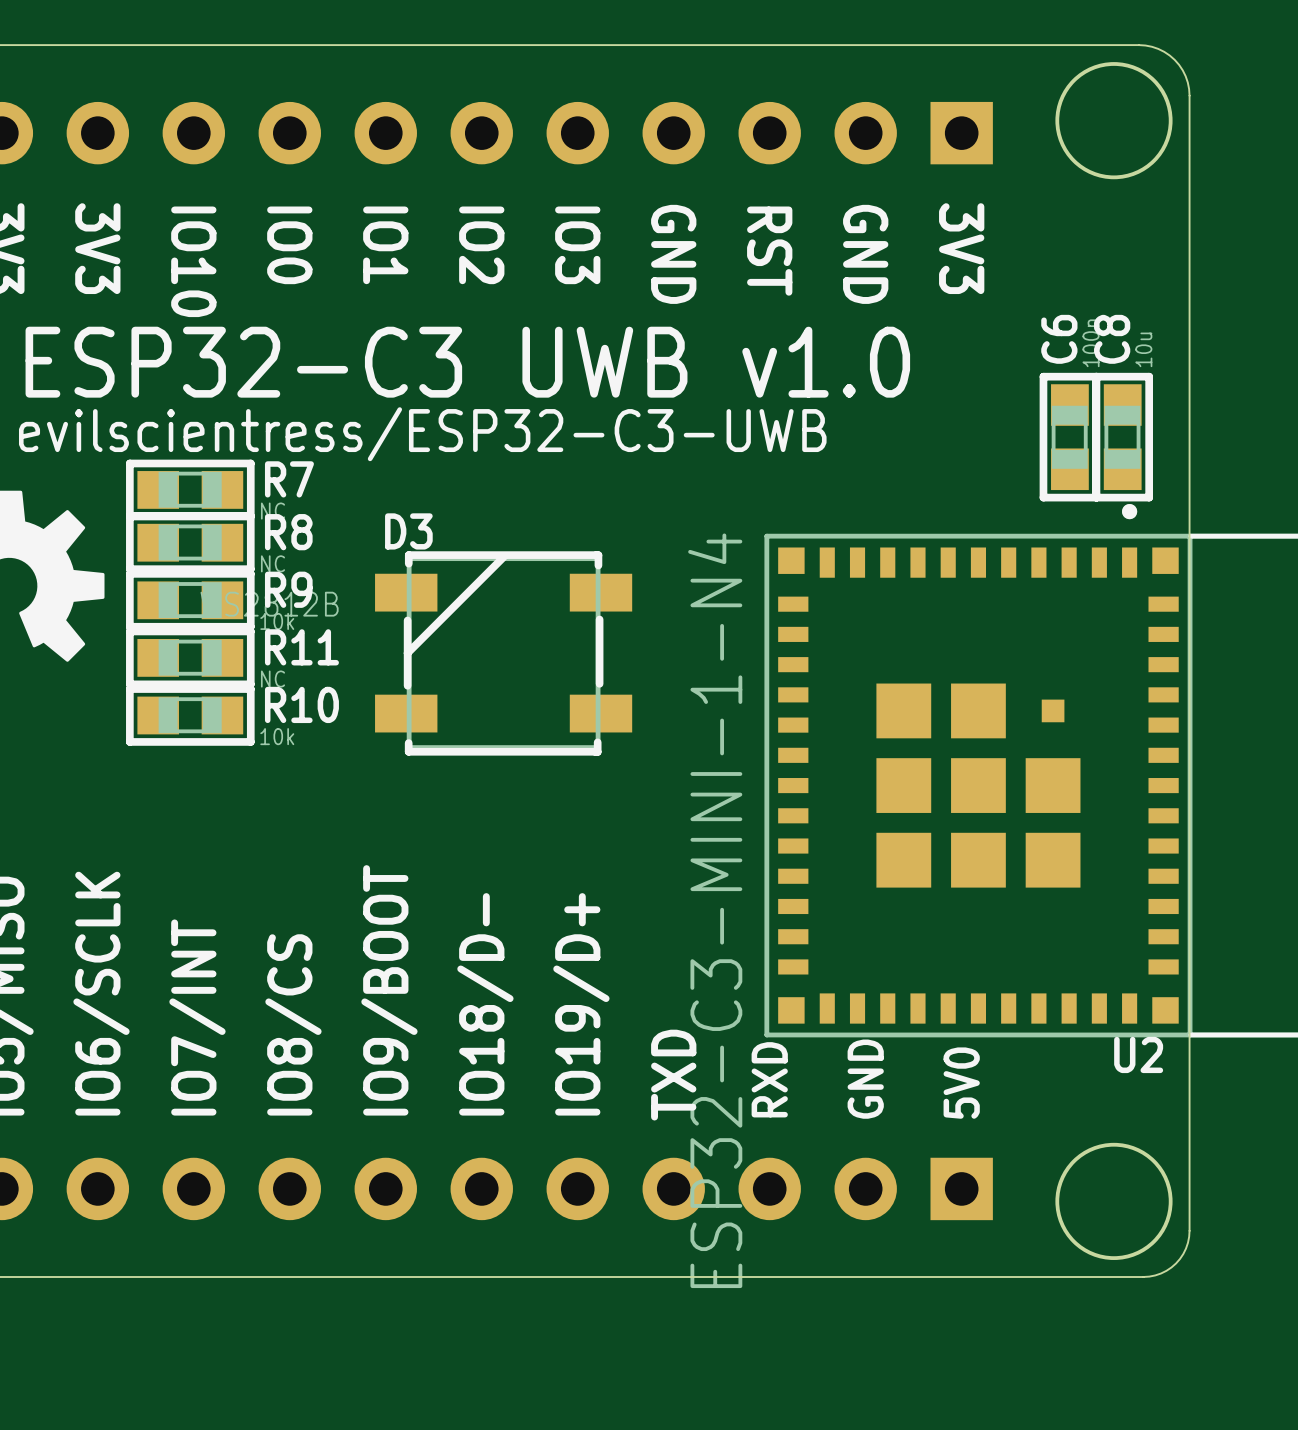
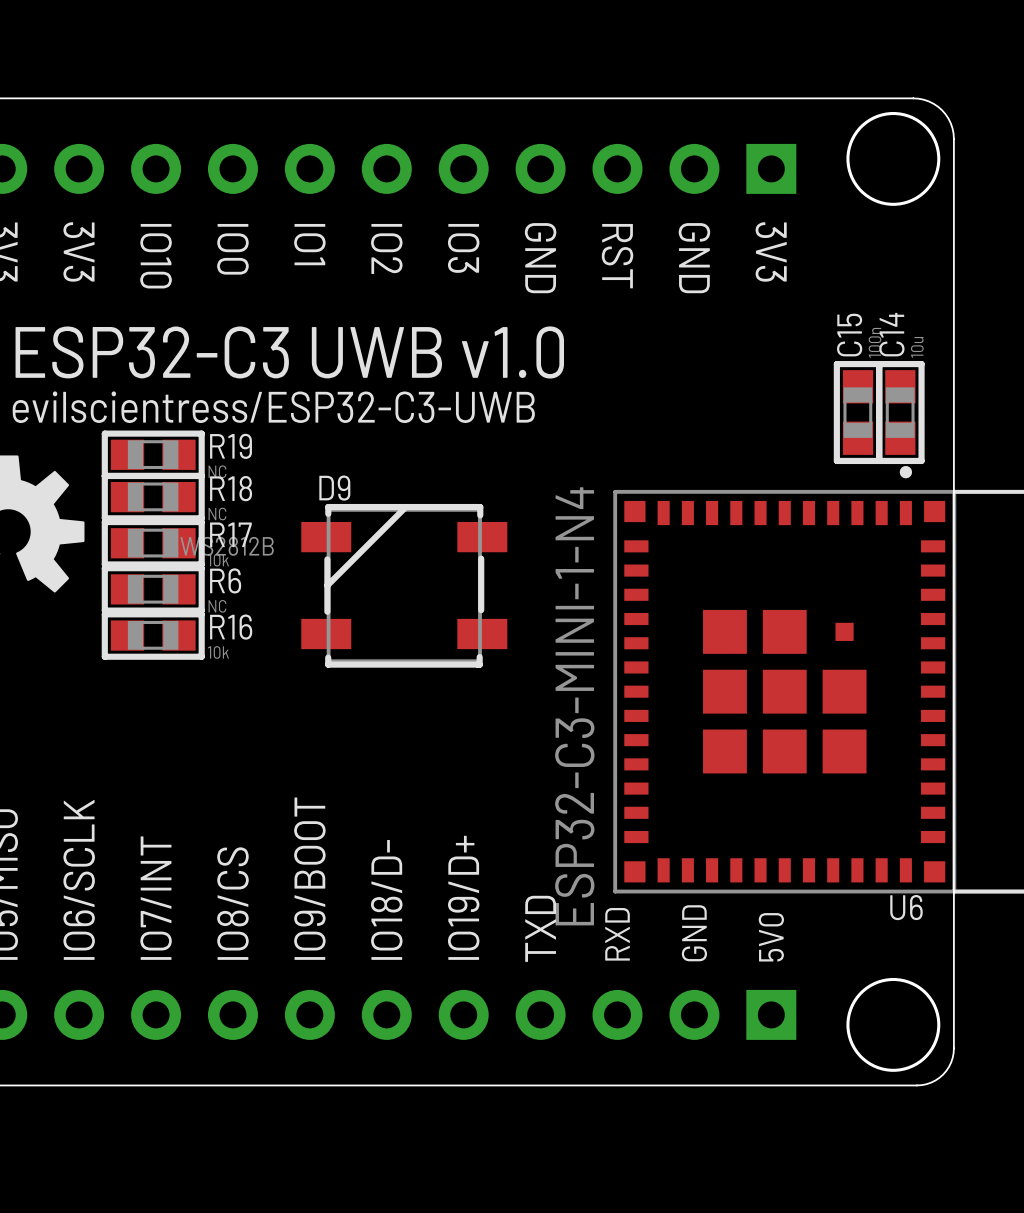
C6 name: C6 (1059, 339) -> C15 (849, 335)
C8 name: C8 (1112, 339) -> C14 (891, 334)
R7 name: R7 (289, 479) -> R19 (231, 446)
D3 name: D3 (408, 531) -> D9 (334, 488)
R8 name: R8 (288, 532) -> R18 (231, 488)
R9 name: R9 (288, 589) -> R17 (230, 534)
R11 name: R11 (301, 647) -> R6 (225, 580)
R10 name: R10 (301, 704) -> R16 (231, 627)
U2 name: U2 (1138, 1054) -> U6 (906, 907)

